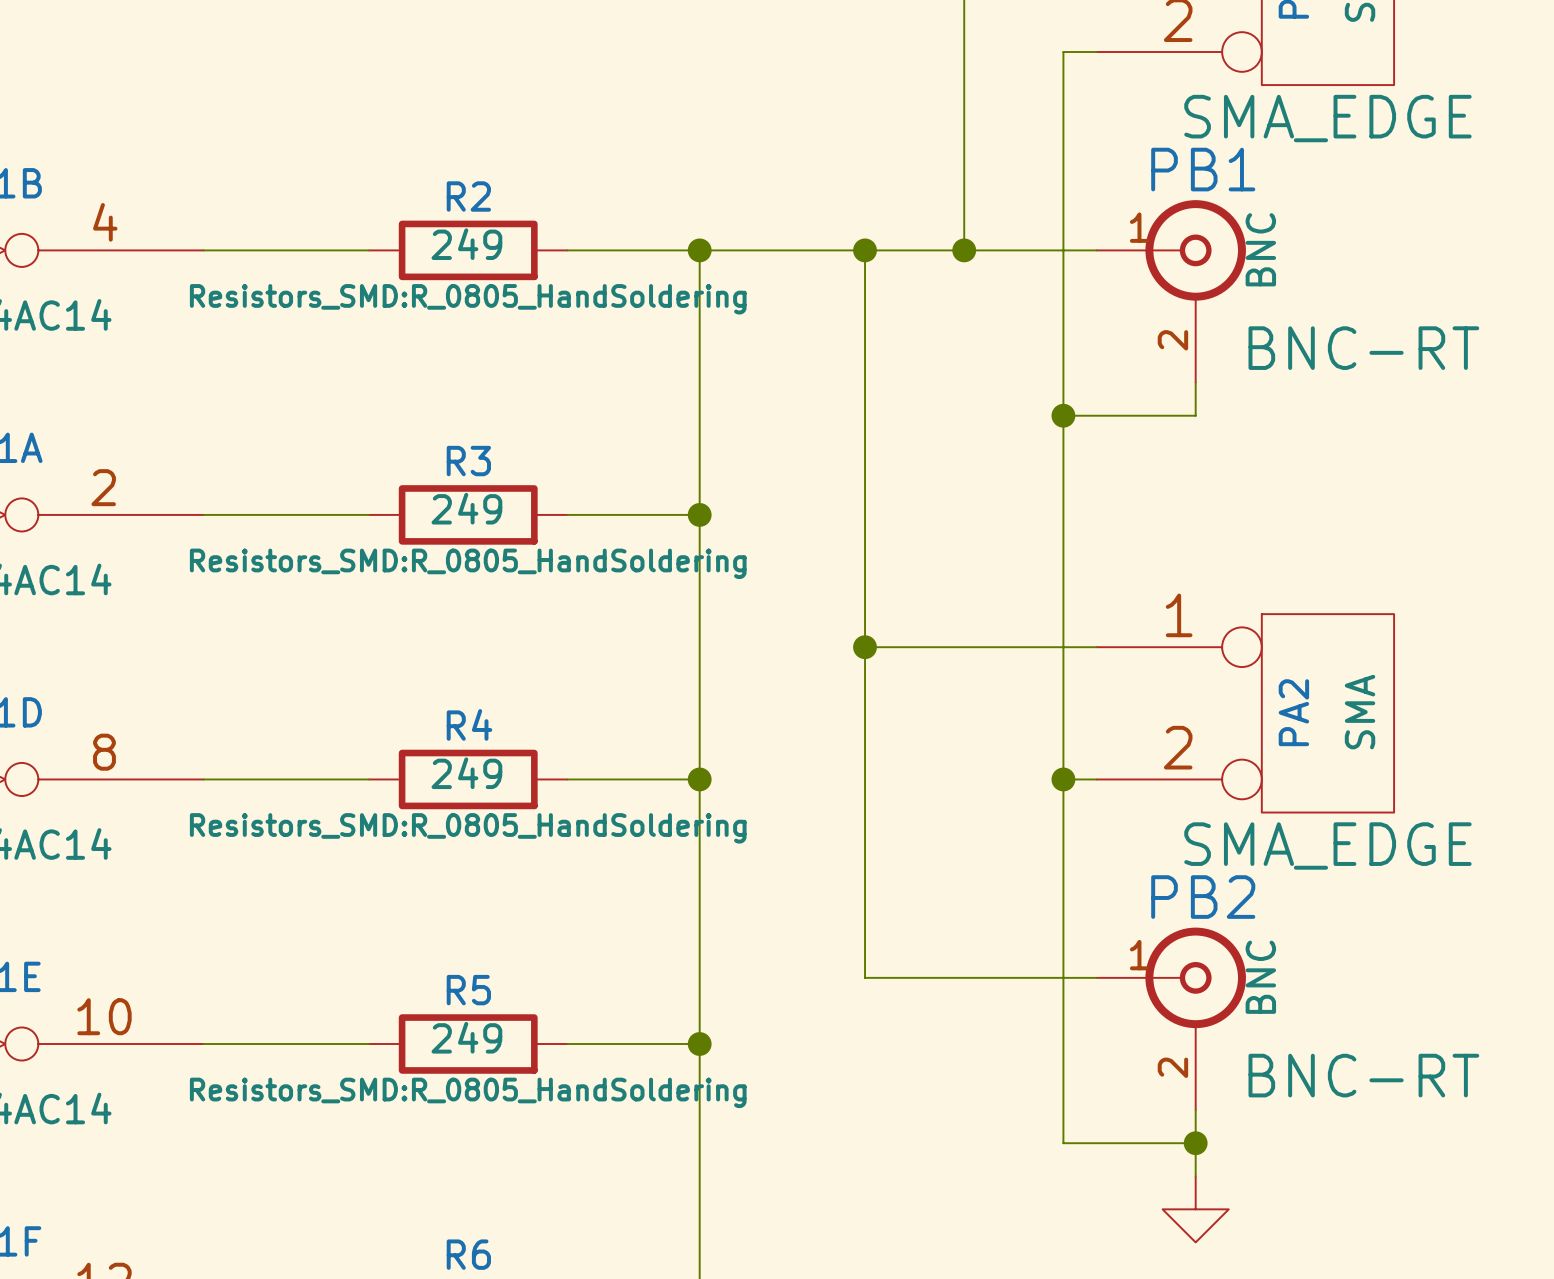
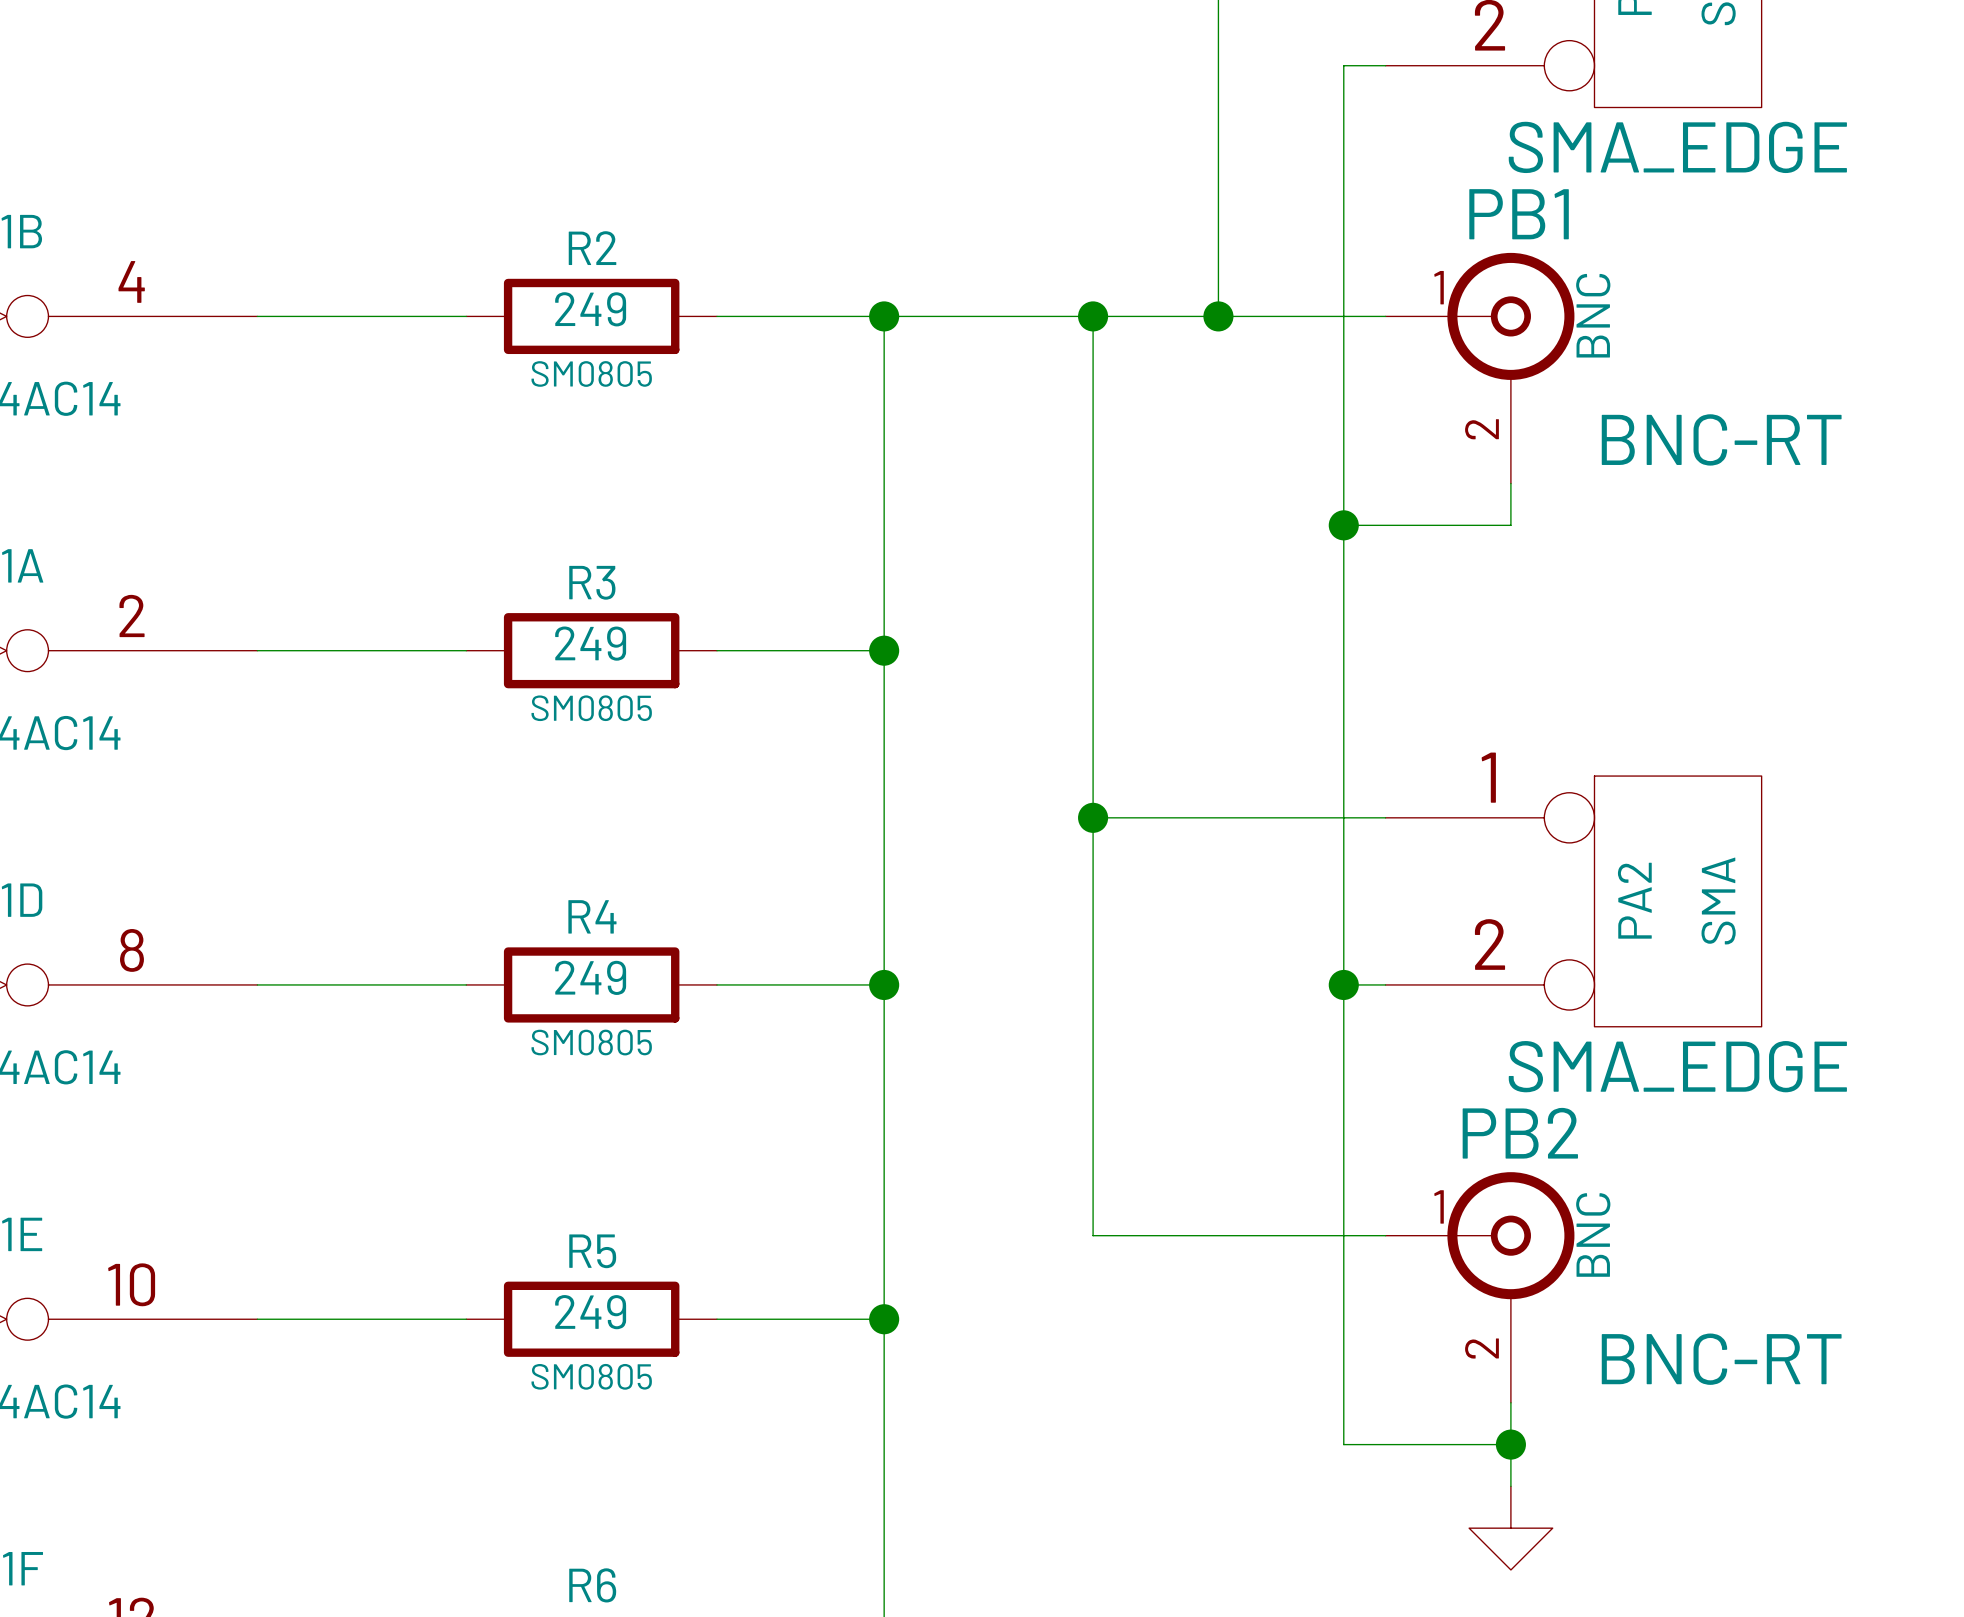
R2 text: Resistors_SMD:R_0805_HandSoldering (468, 299) -> SM0805 (591, 373)
R3 text: Resistors_SMD:R_0805_HandSoldering (468, 563) -> SM0805 (591, 708)
R4 text: Resistors_SMD:R_0805_HandSoldering (468, 828) -> SM0805 (591, 1042)
R5 text: Resistors_SMD:R_0805_HandSoldering (468, 1092) -> SM0805 (591, 1376)

